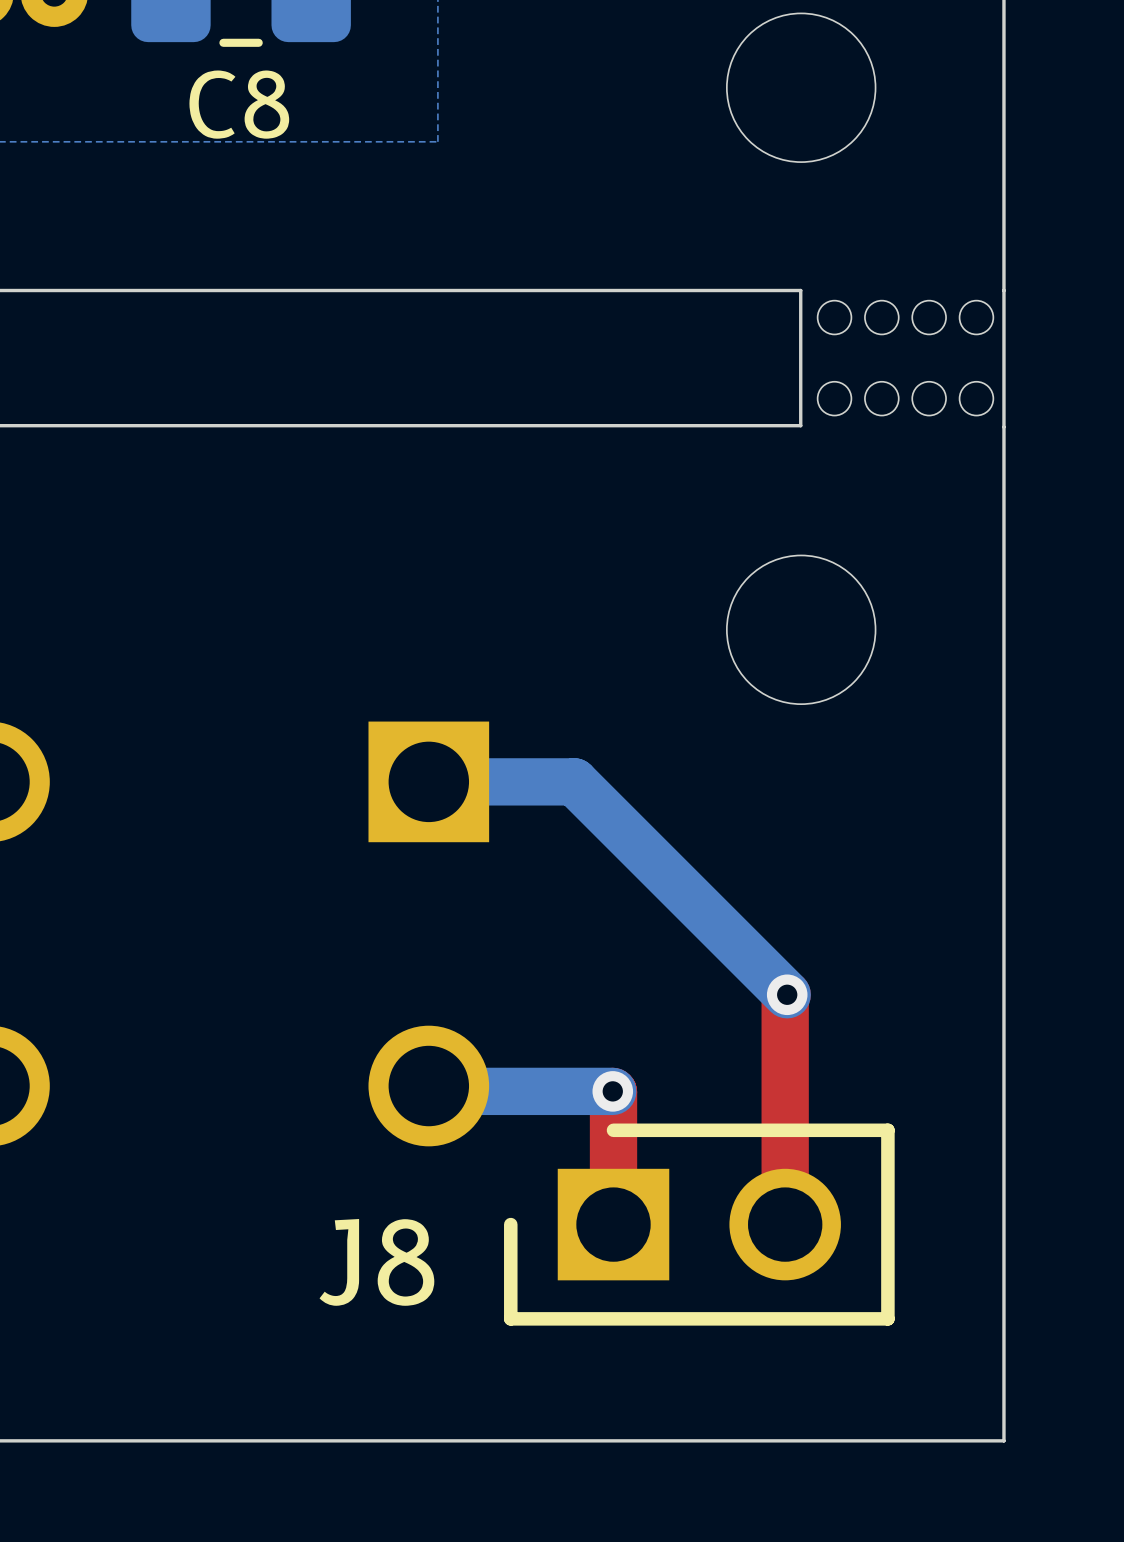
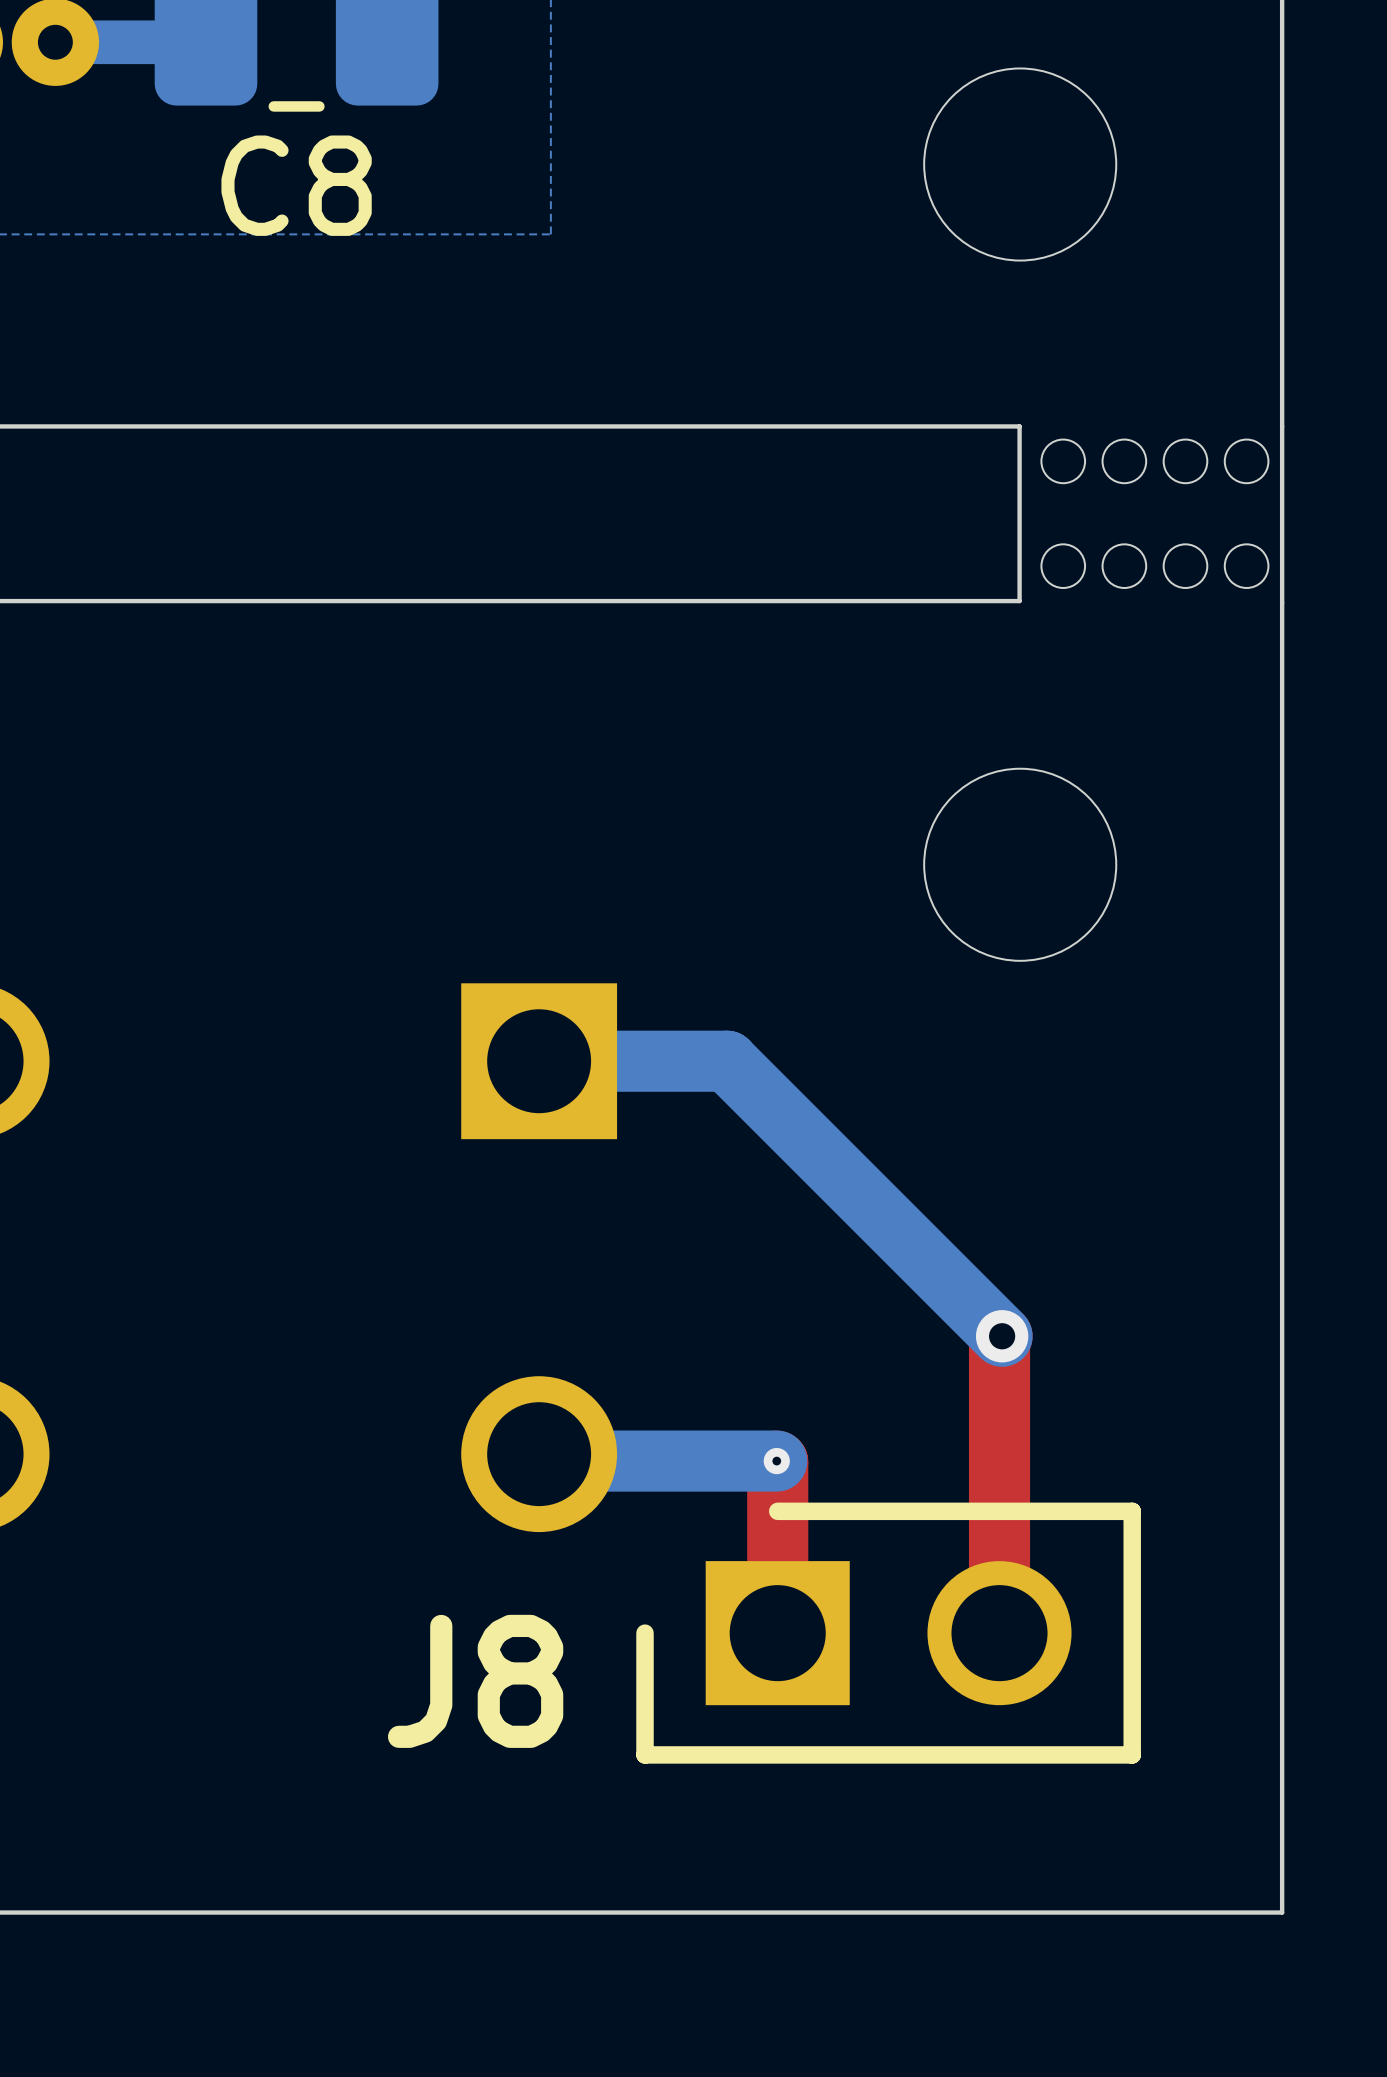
via size: [592, 1071, 634, 1112] -> [763, 1447, 790, 1475]

